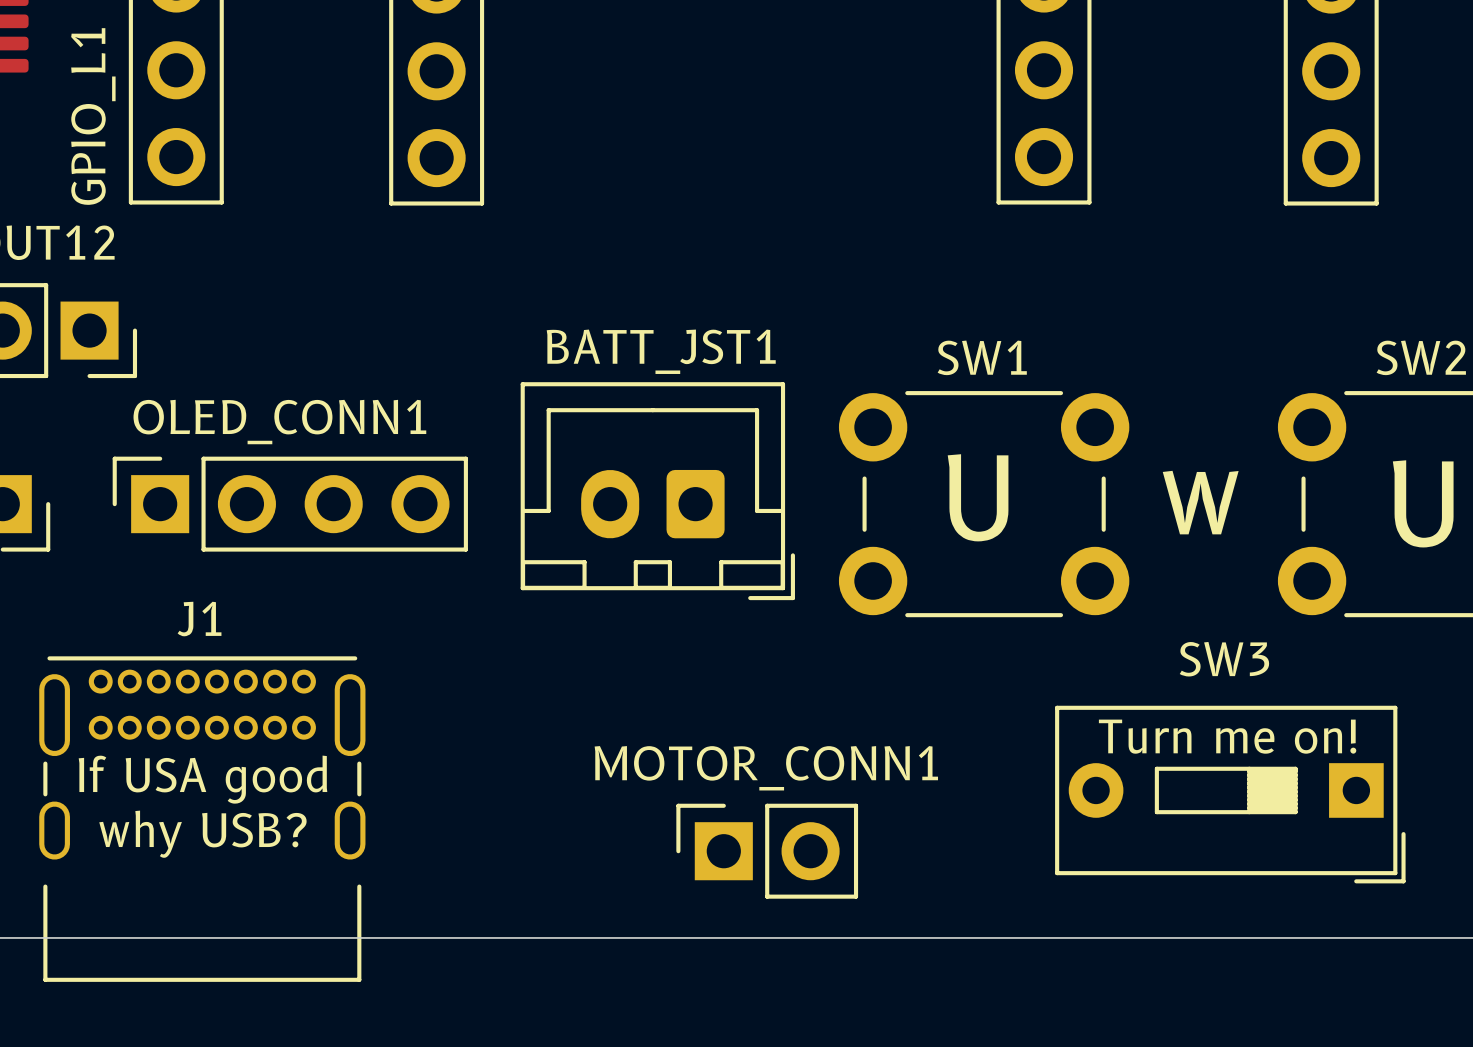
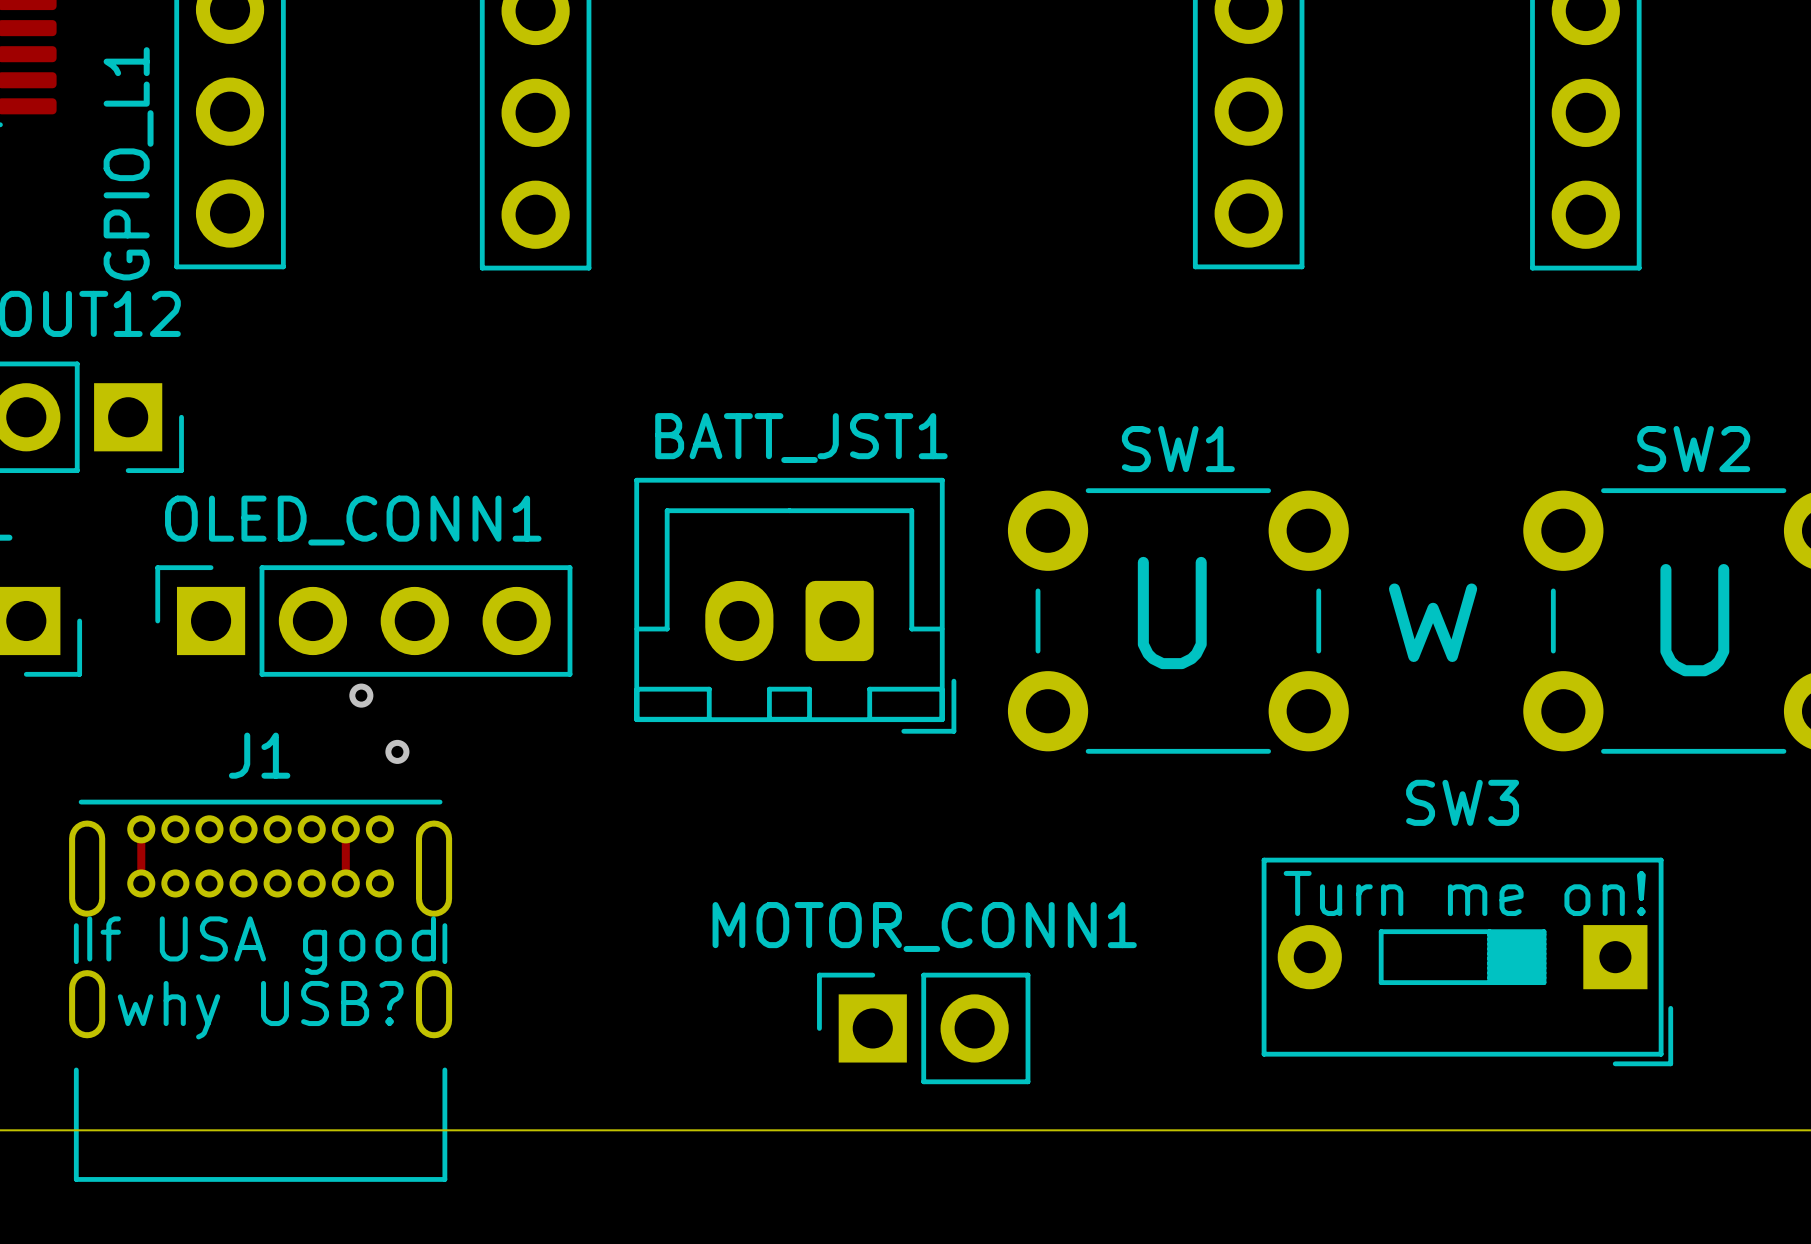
via: none -> (361, 695)
via: none -> (397, 751)
track: none -> (141, 829) (141, 883)
track: none -> (345, 829) (345, 883)

